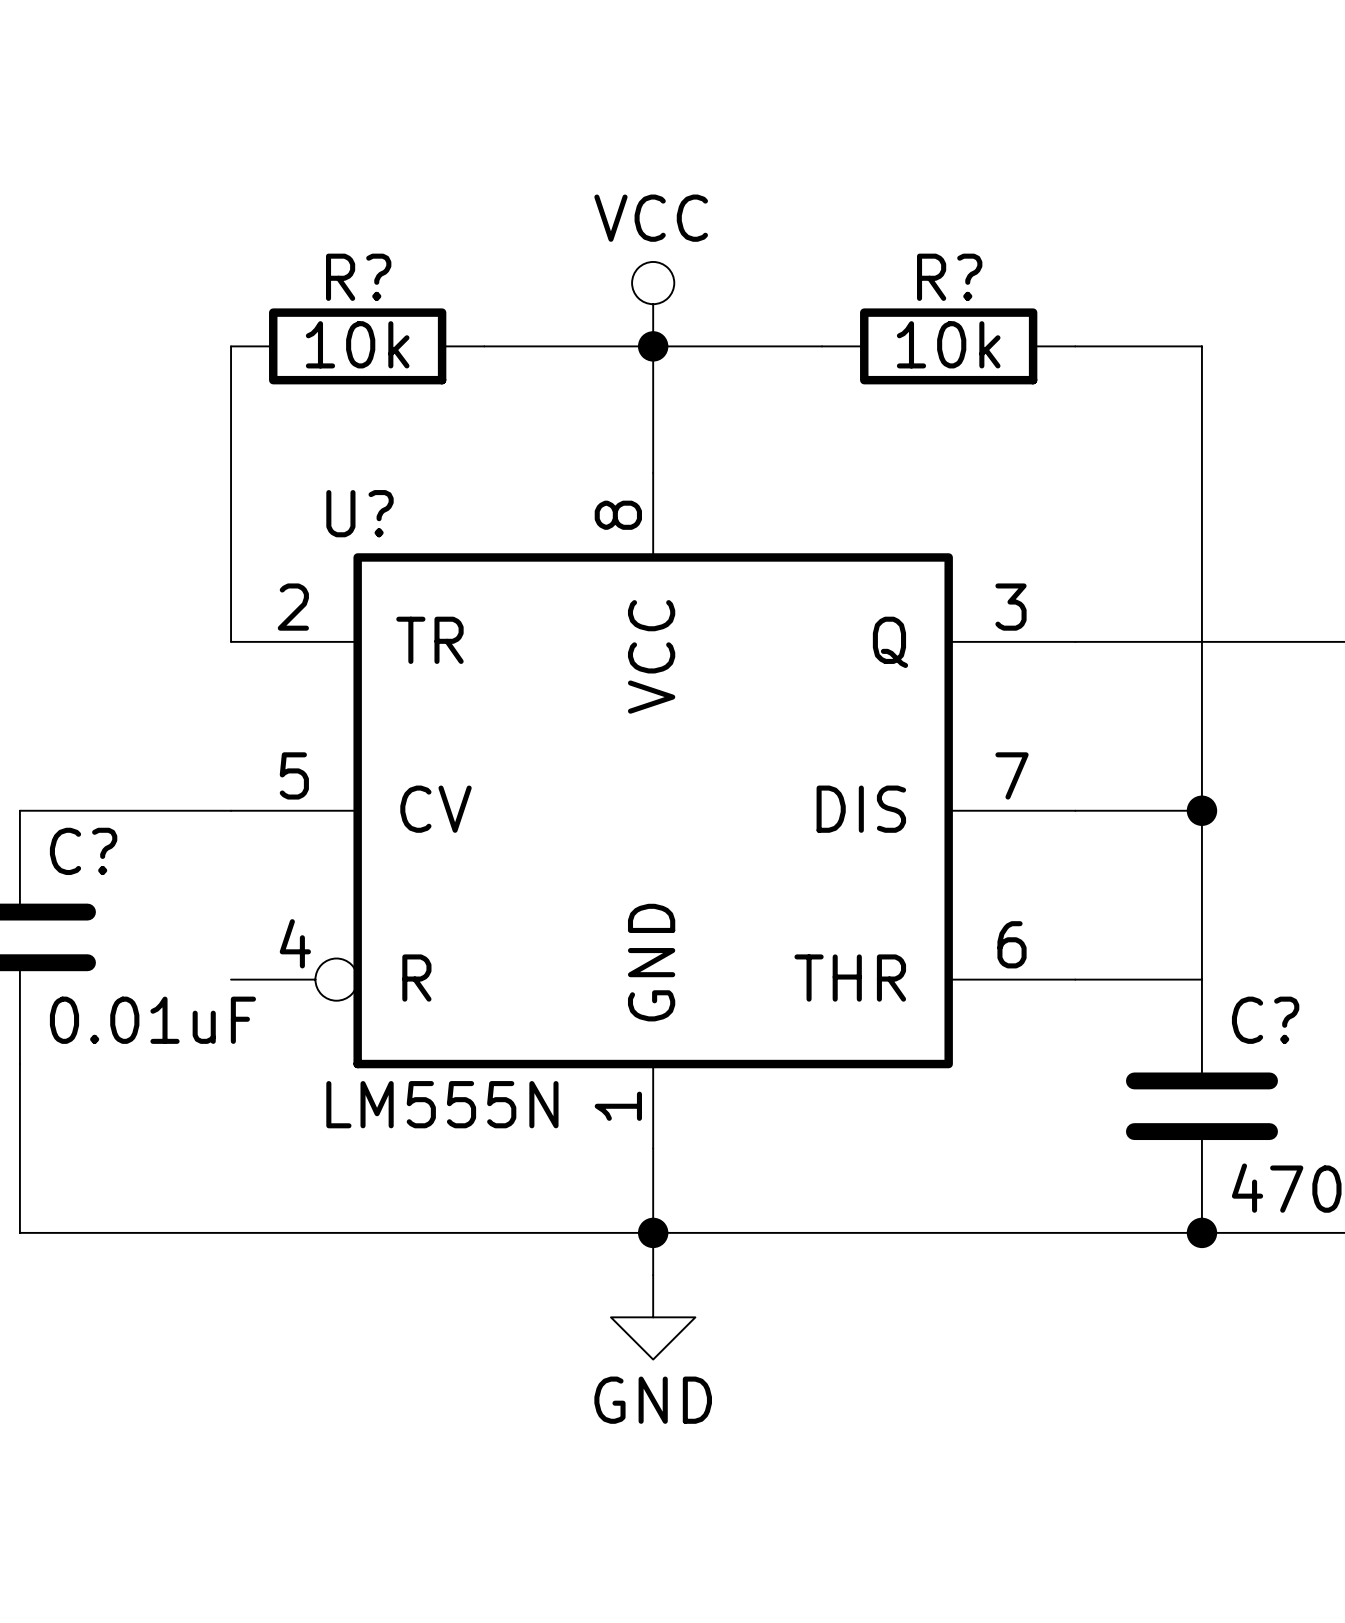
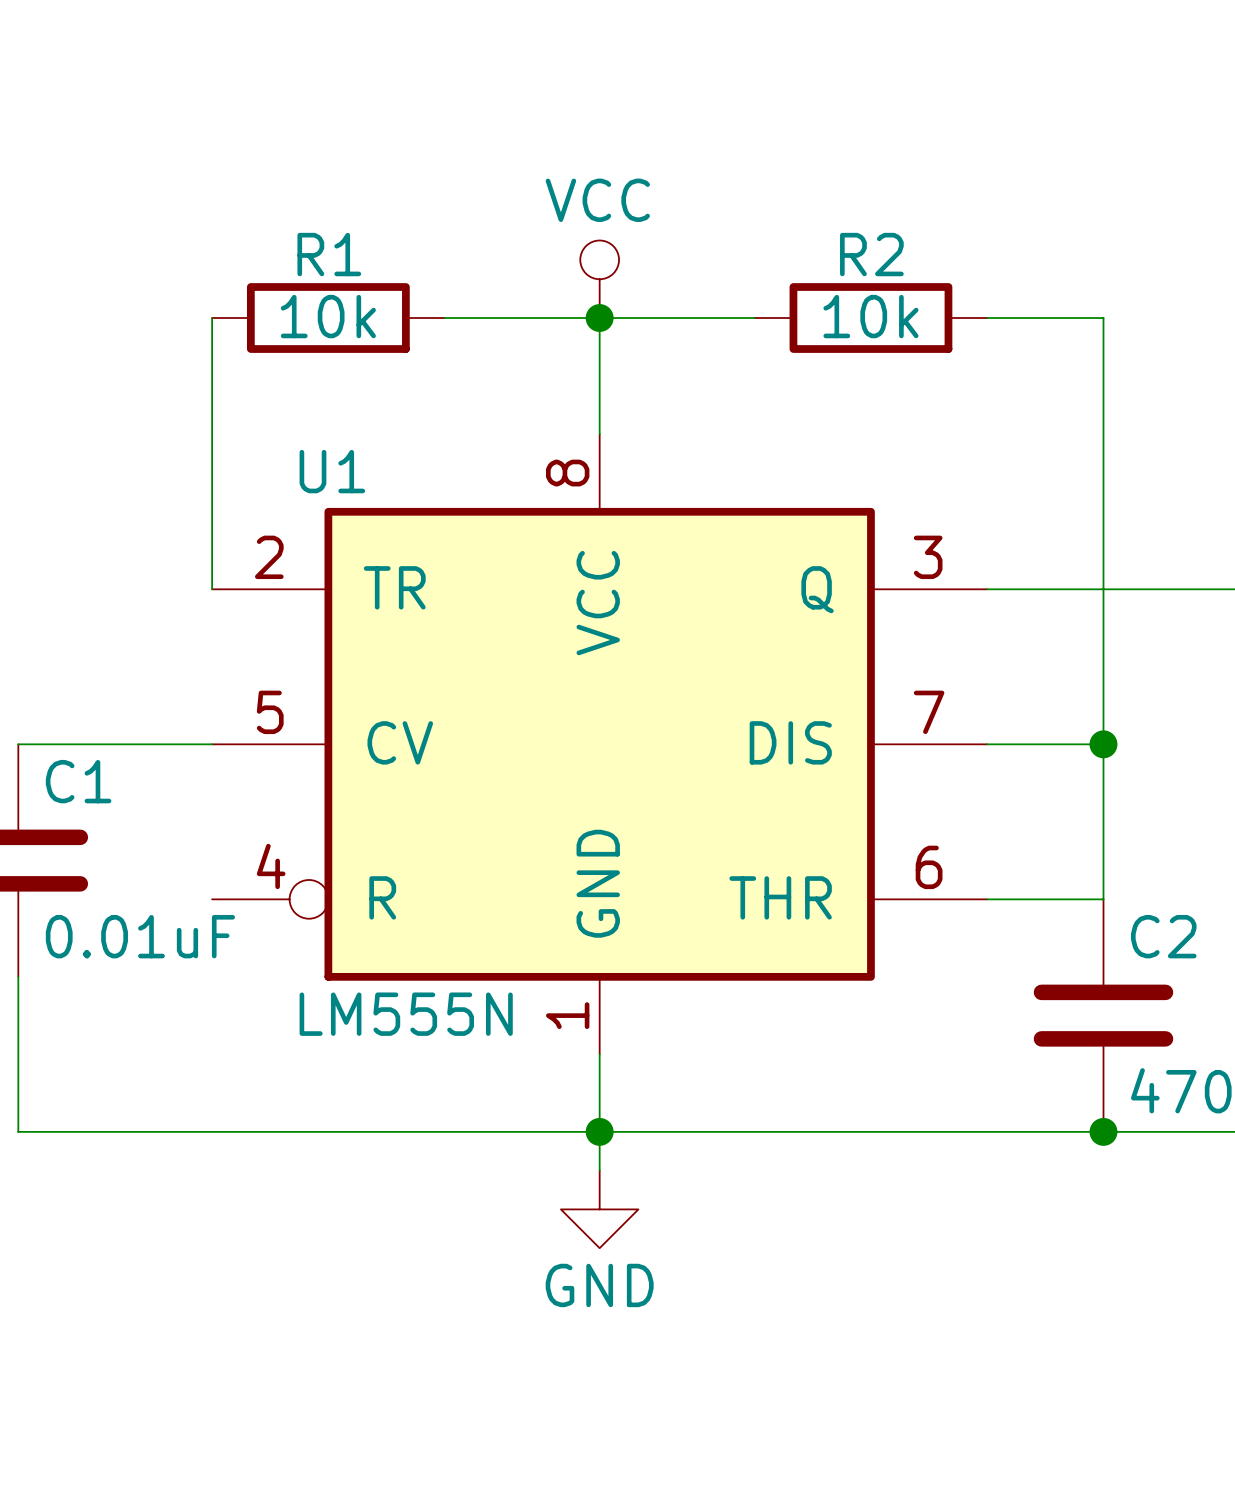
R? name: R? (358, 277) -> R1 (329, 254)
R? name: R? (949, 277) -> R2 (871, 254)
U? name: U? (360, 513) -> U1 (332, 471)
C? name: C? (83, 851) -> C1 (78, 781)
C? name: C? (1265, 1020) -> C2 (1163, 936)

